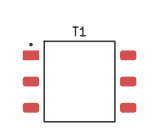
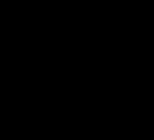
T1: (79, 81) -> none

